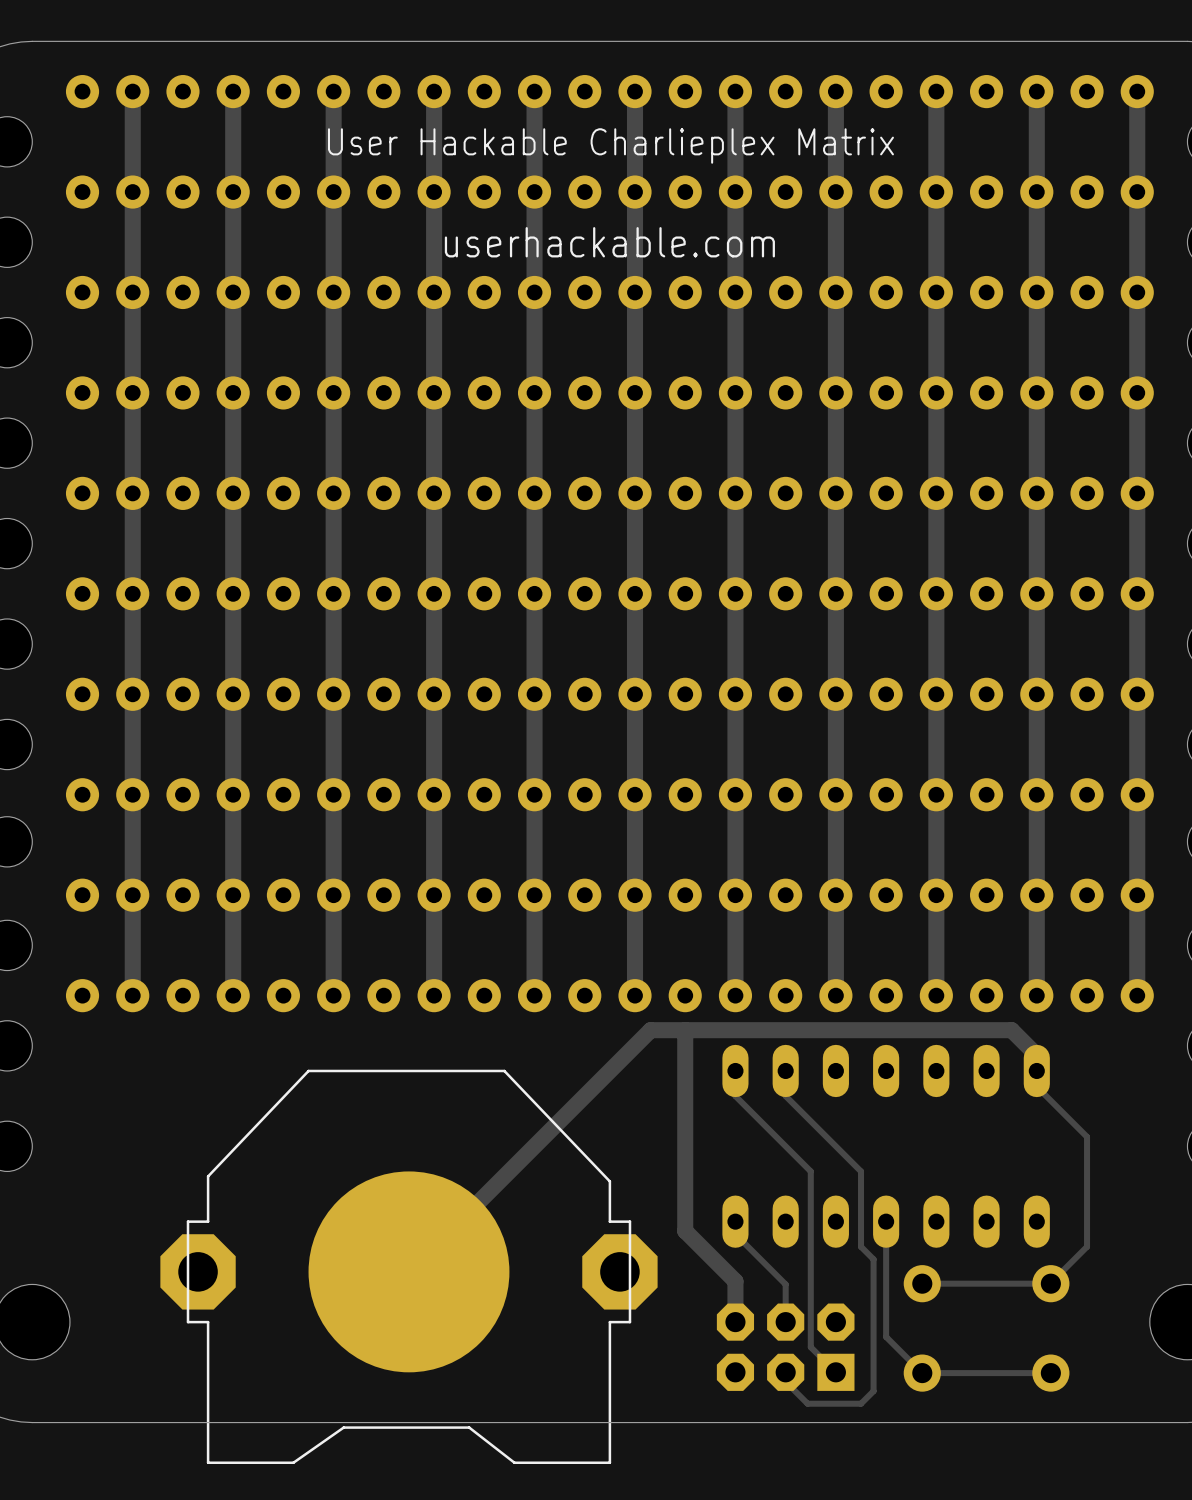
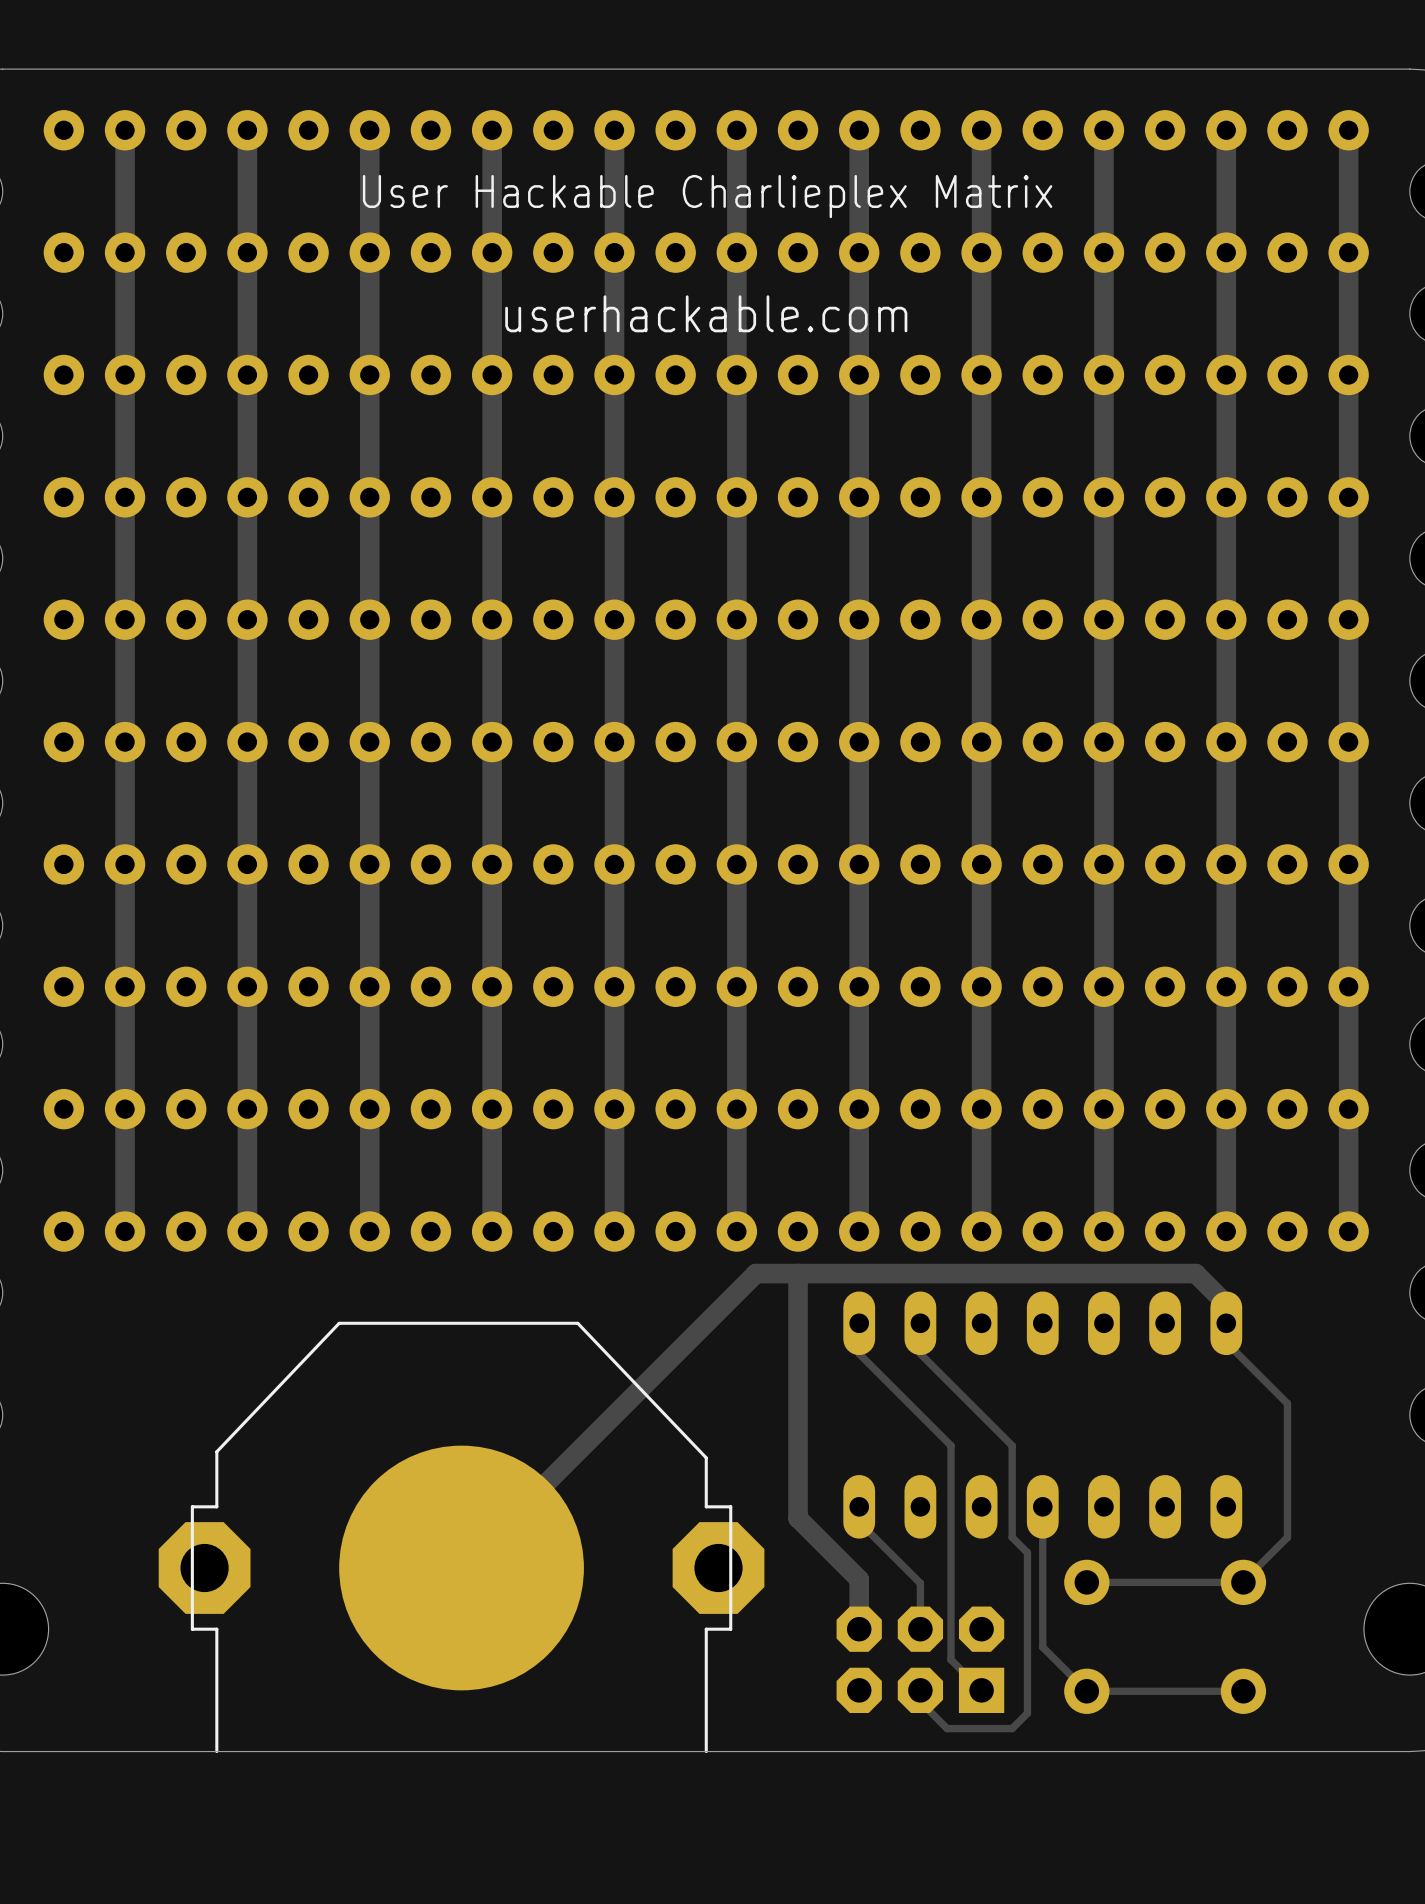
part: none -> (461, 1537)
part: (408, 1266) -> none

